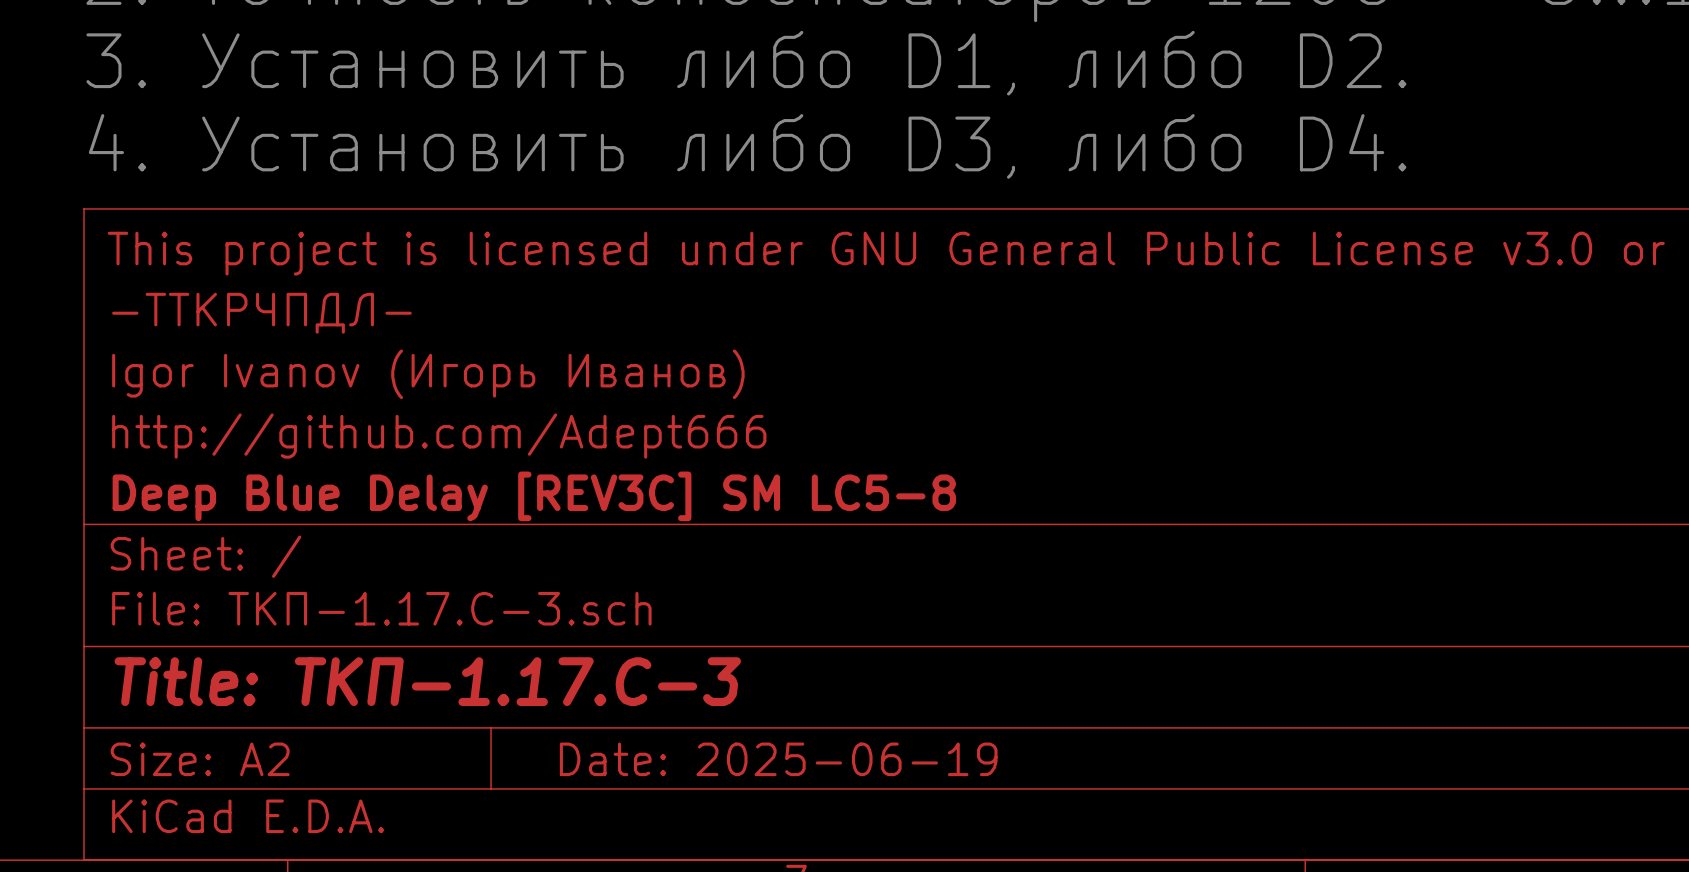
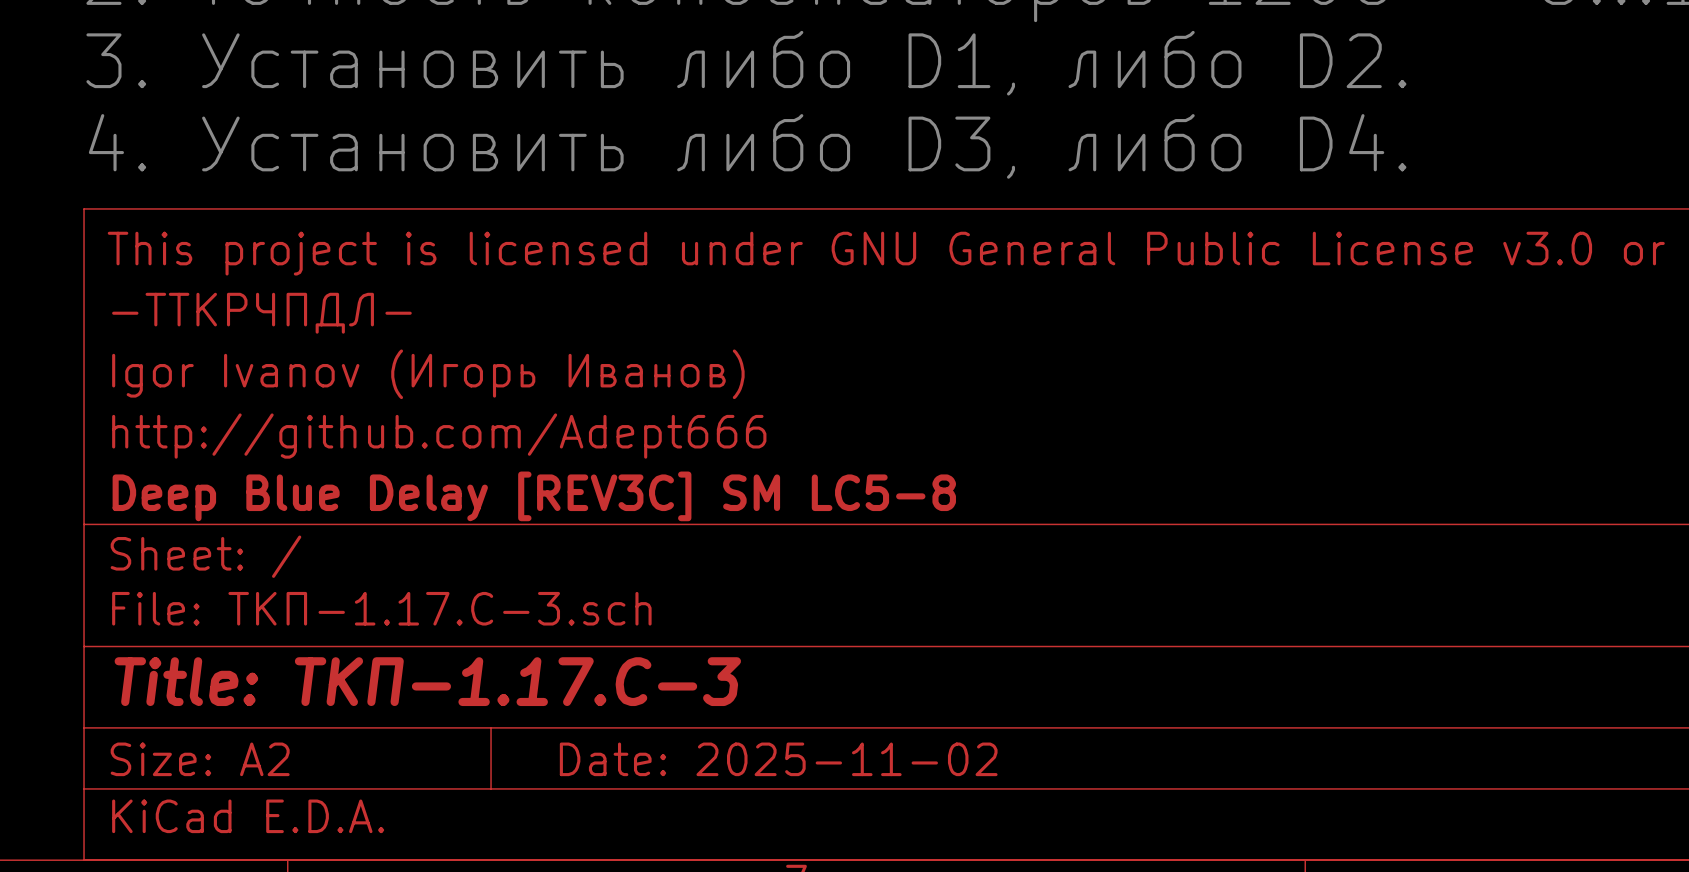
title block: Date: 2025-06-19 (778, 759) -> Date: 2025-11-02 (778, 759)

